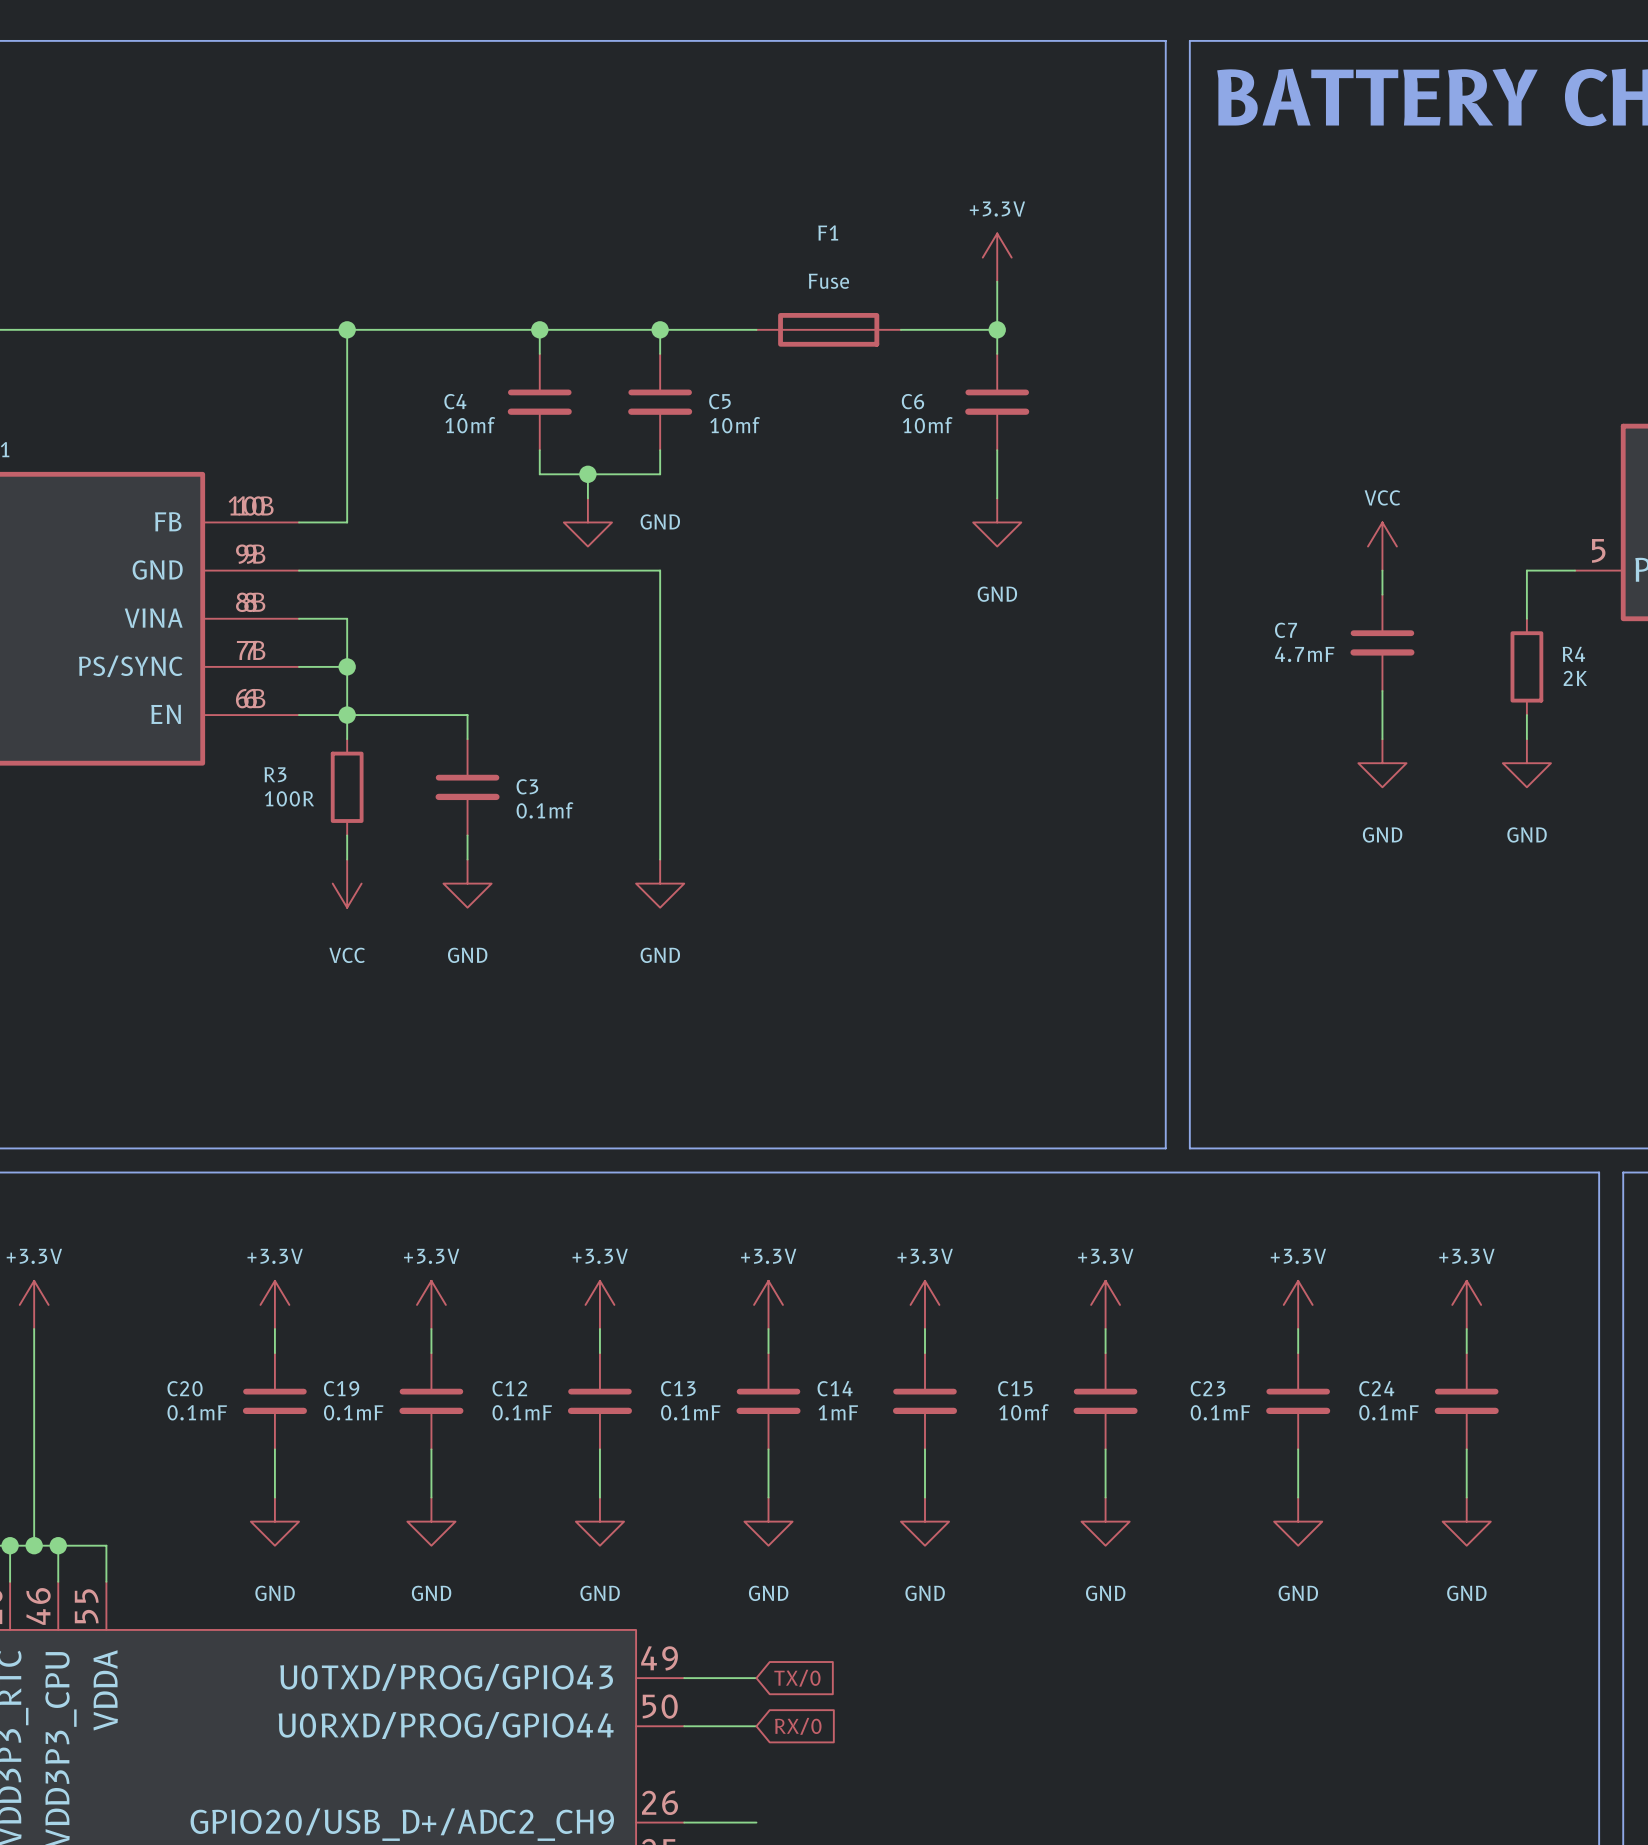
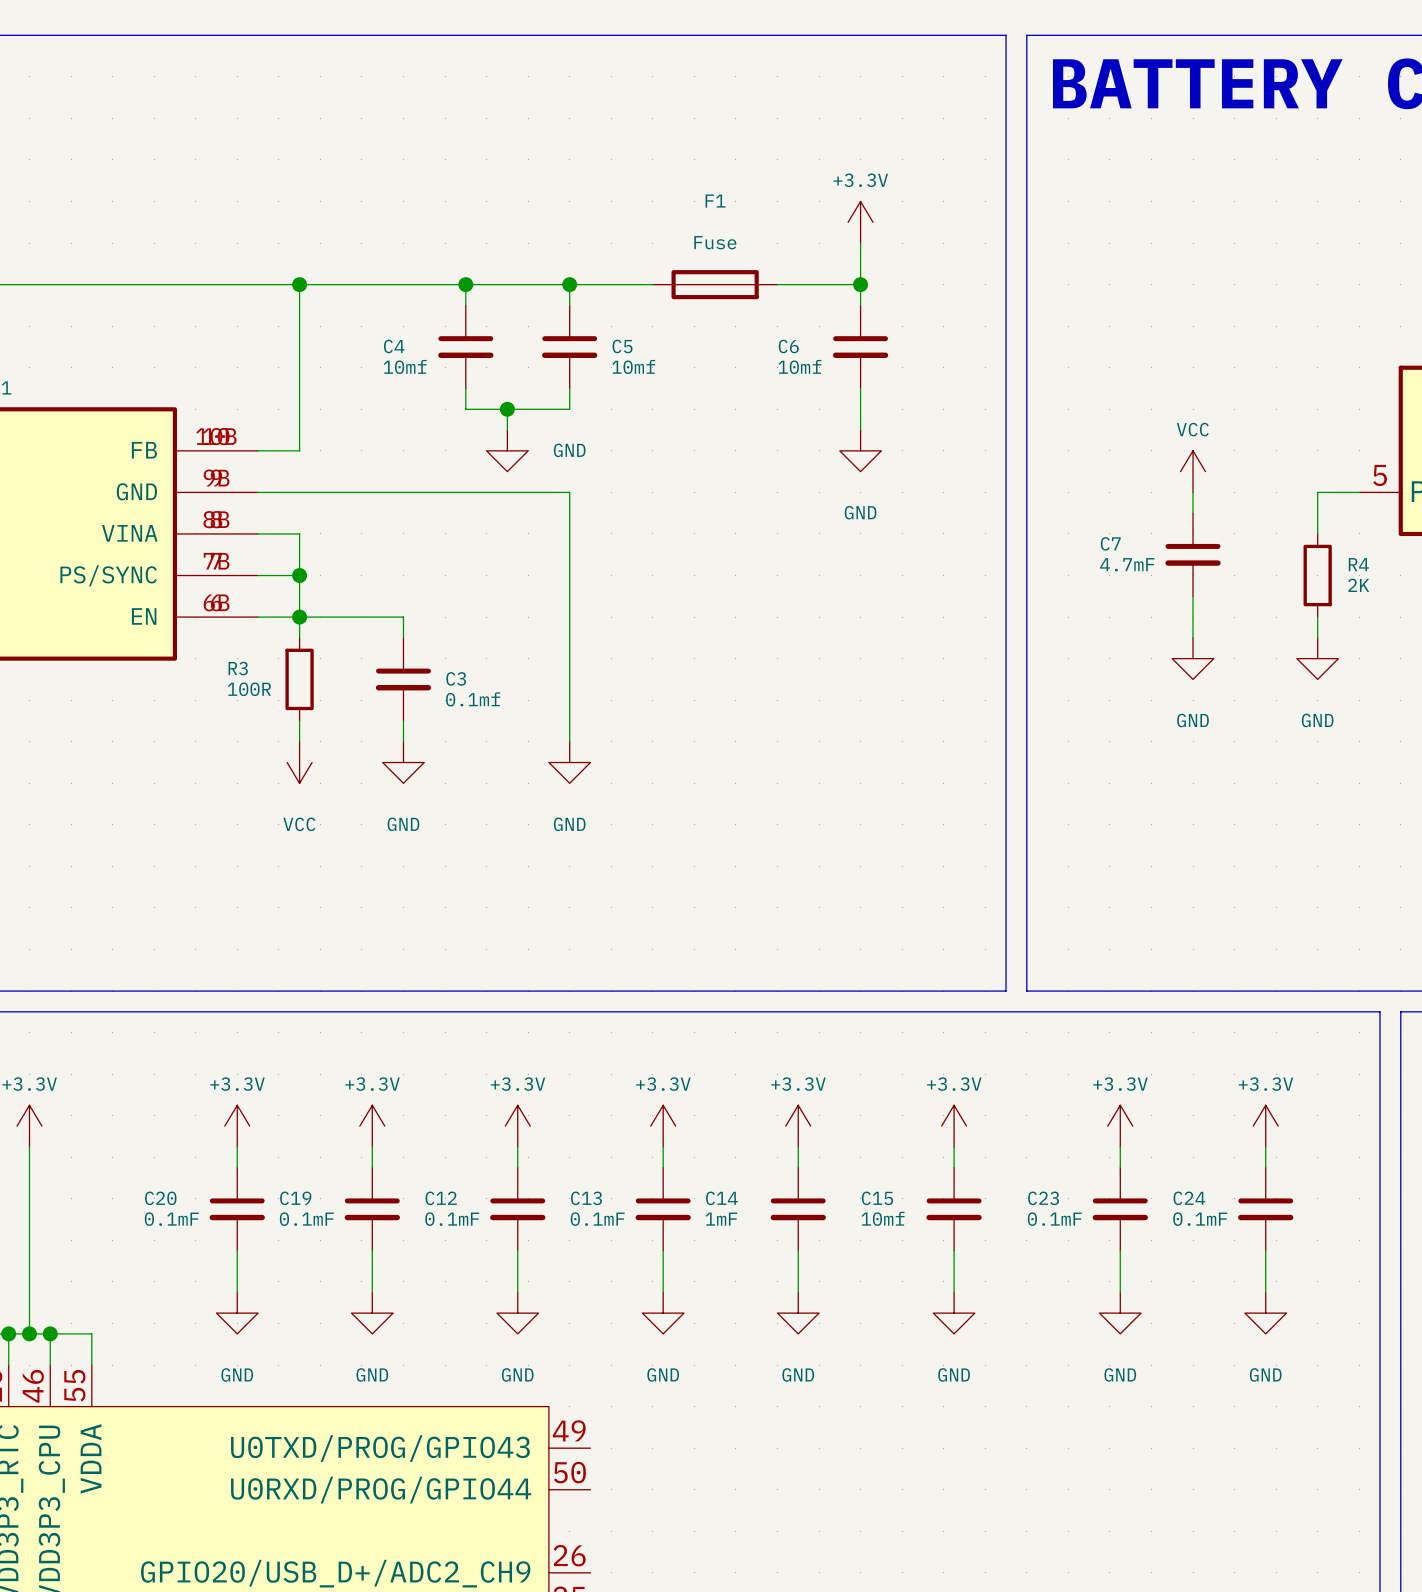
wire: (684, 1678) (756, 1678) -> none
global label: TX/0 (797, 1678) -> none
wire: (684, 1726) (756, 1726) -> none
global label: RX/0 (798, 1726) -> none
wire: (684, 1822) (756, 1822) -> none

